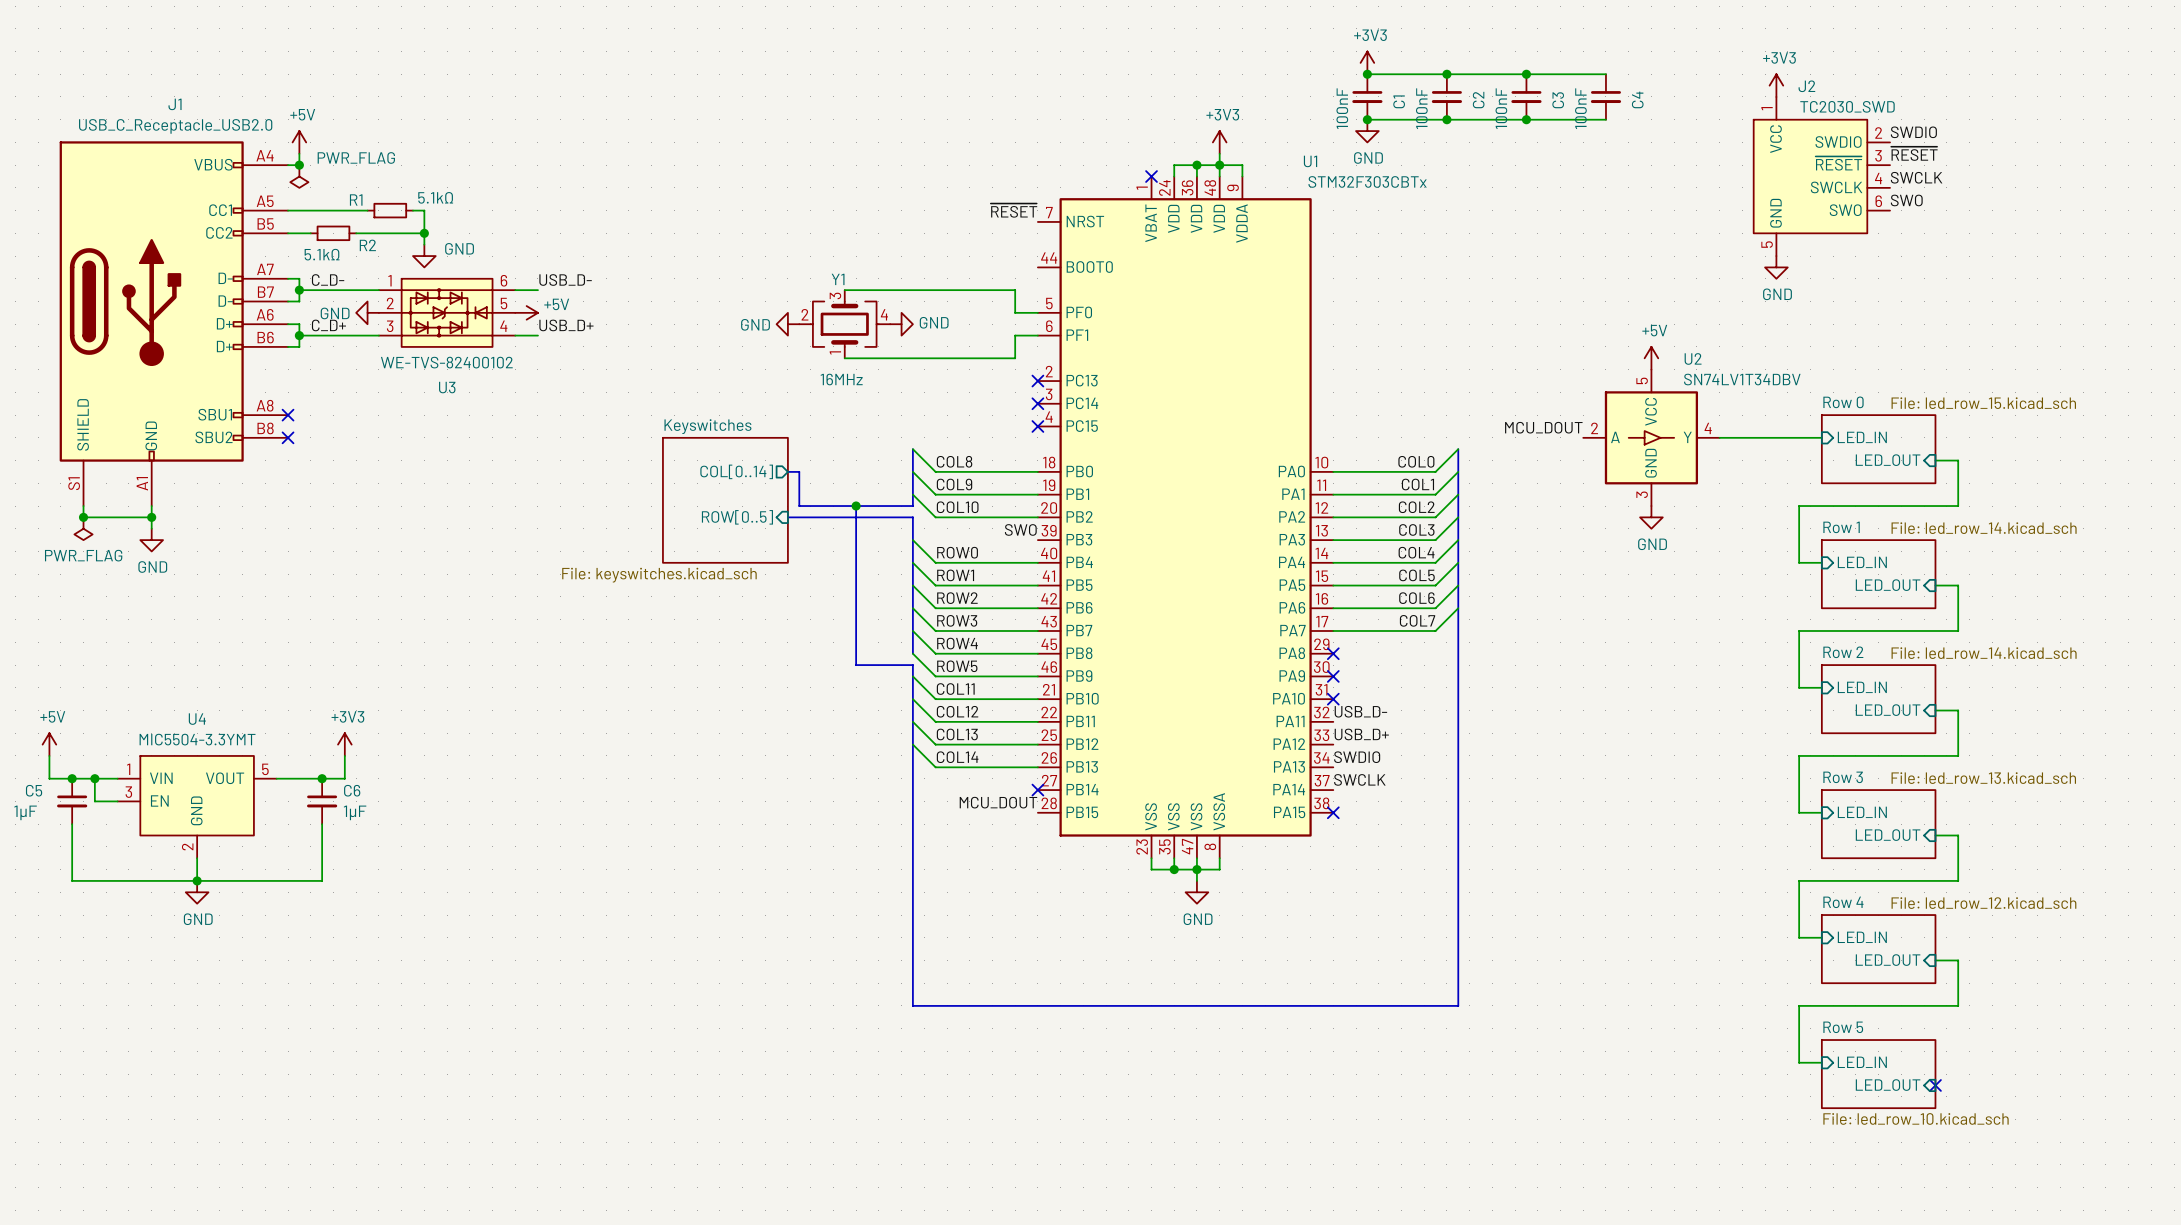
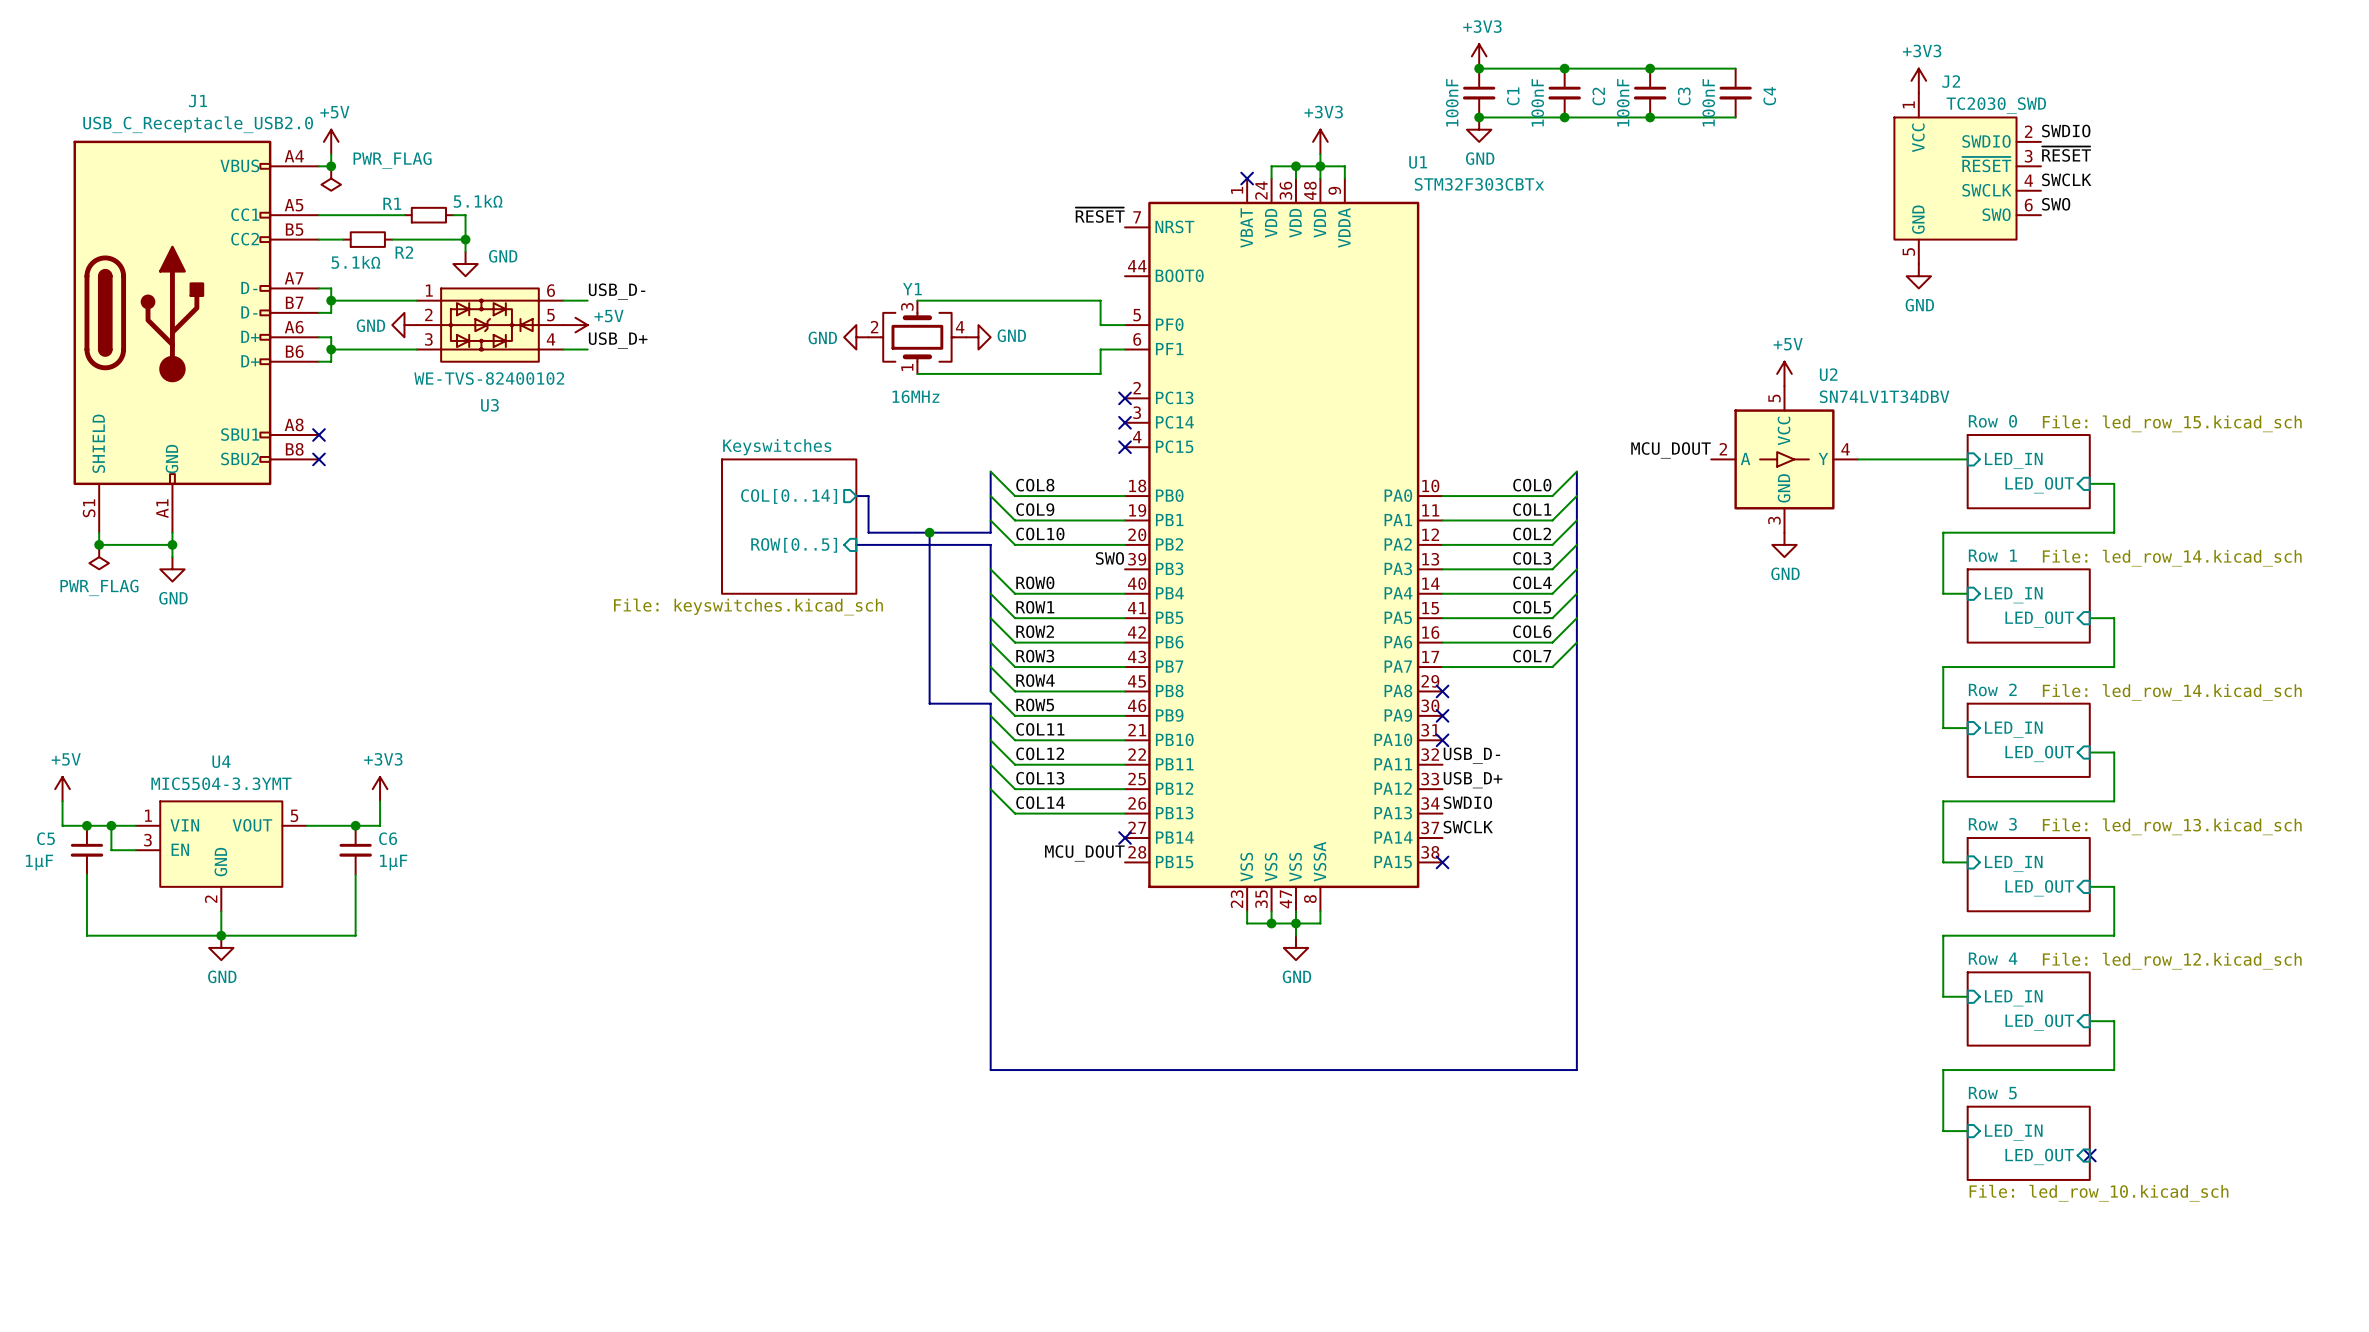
label: C_D- (328, 280) -> none
label: C_D+ (328, 325) -> none

